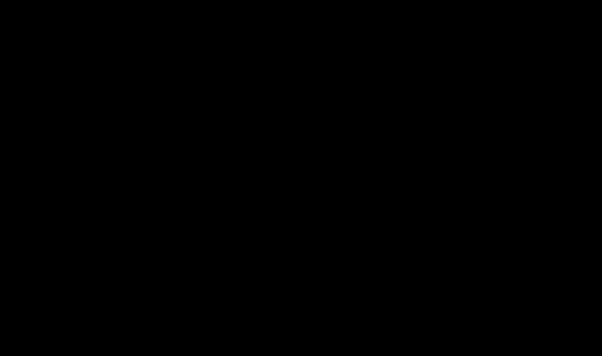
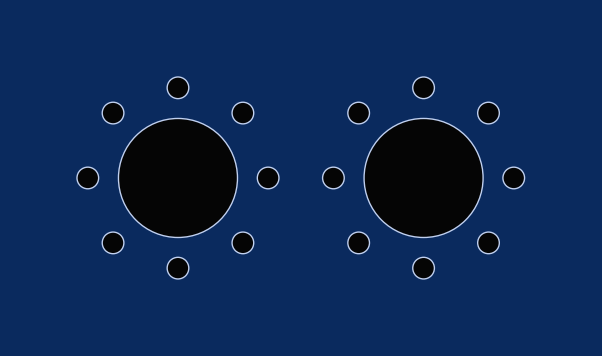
part: none -> (177, 177)
part: none -> (423, 177)

